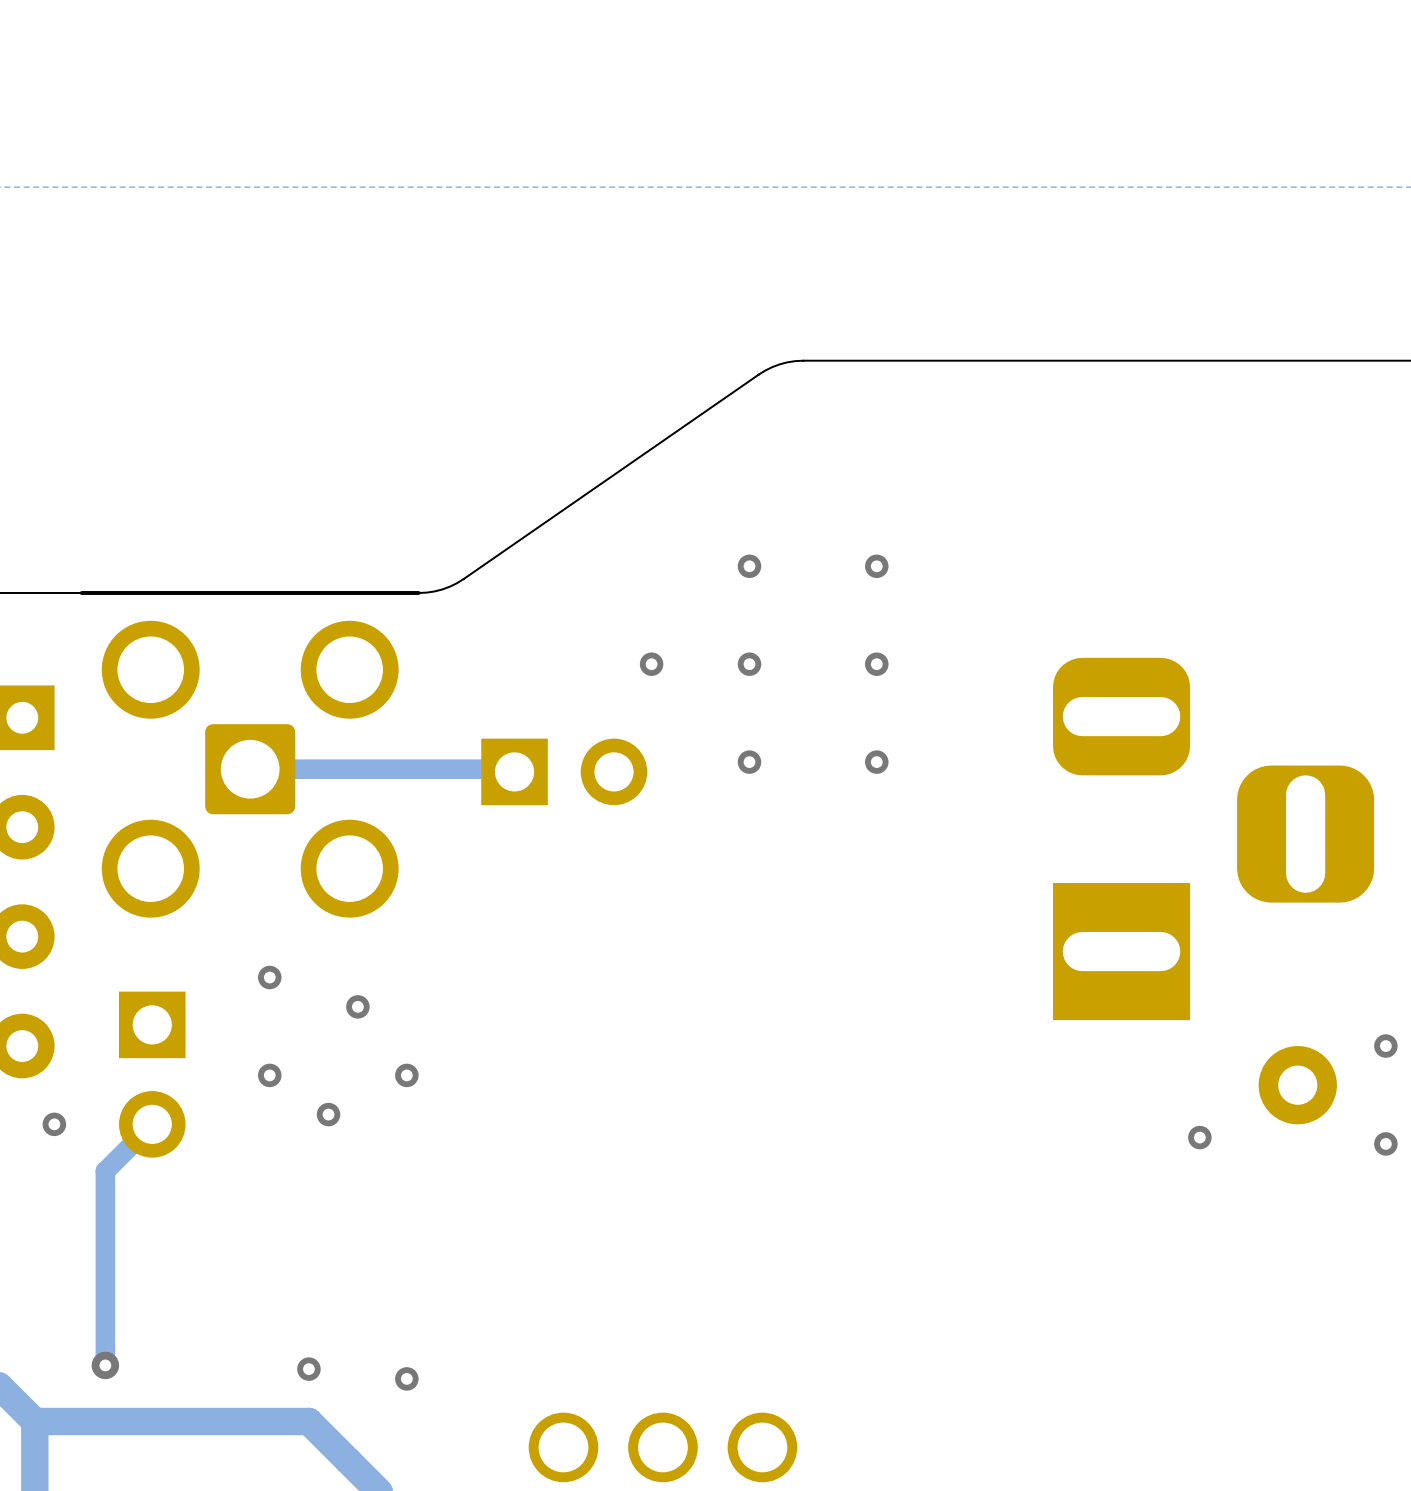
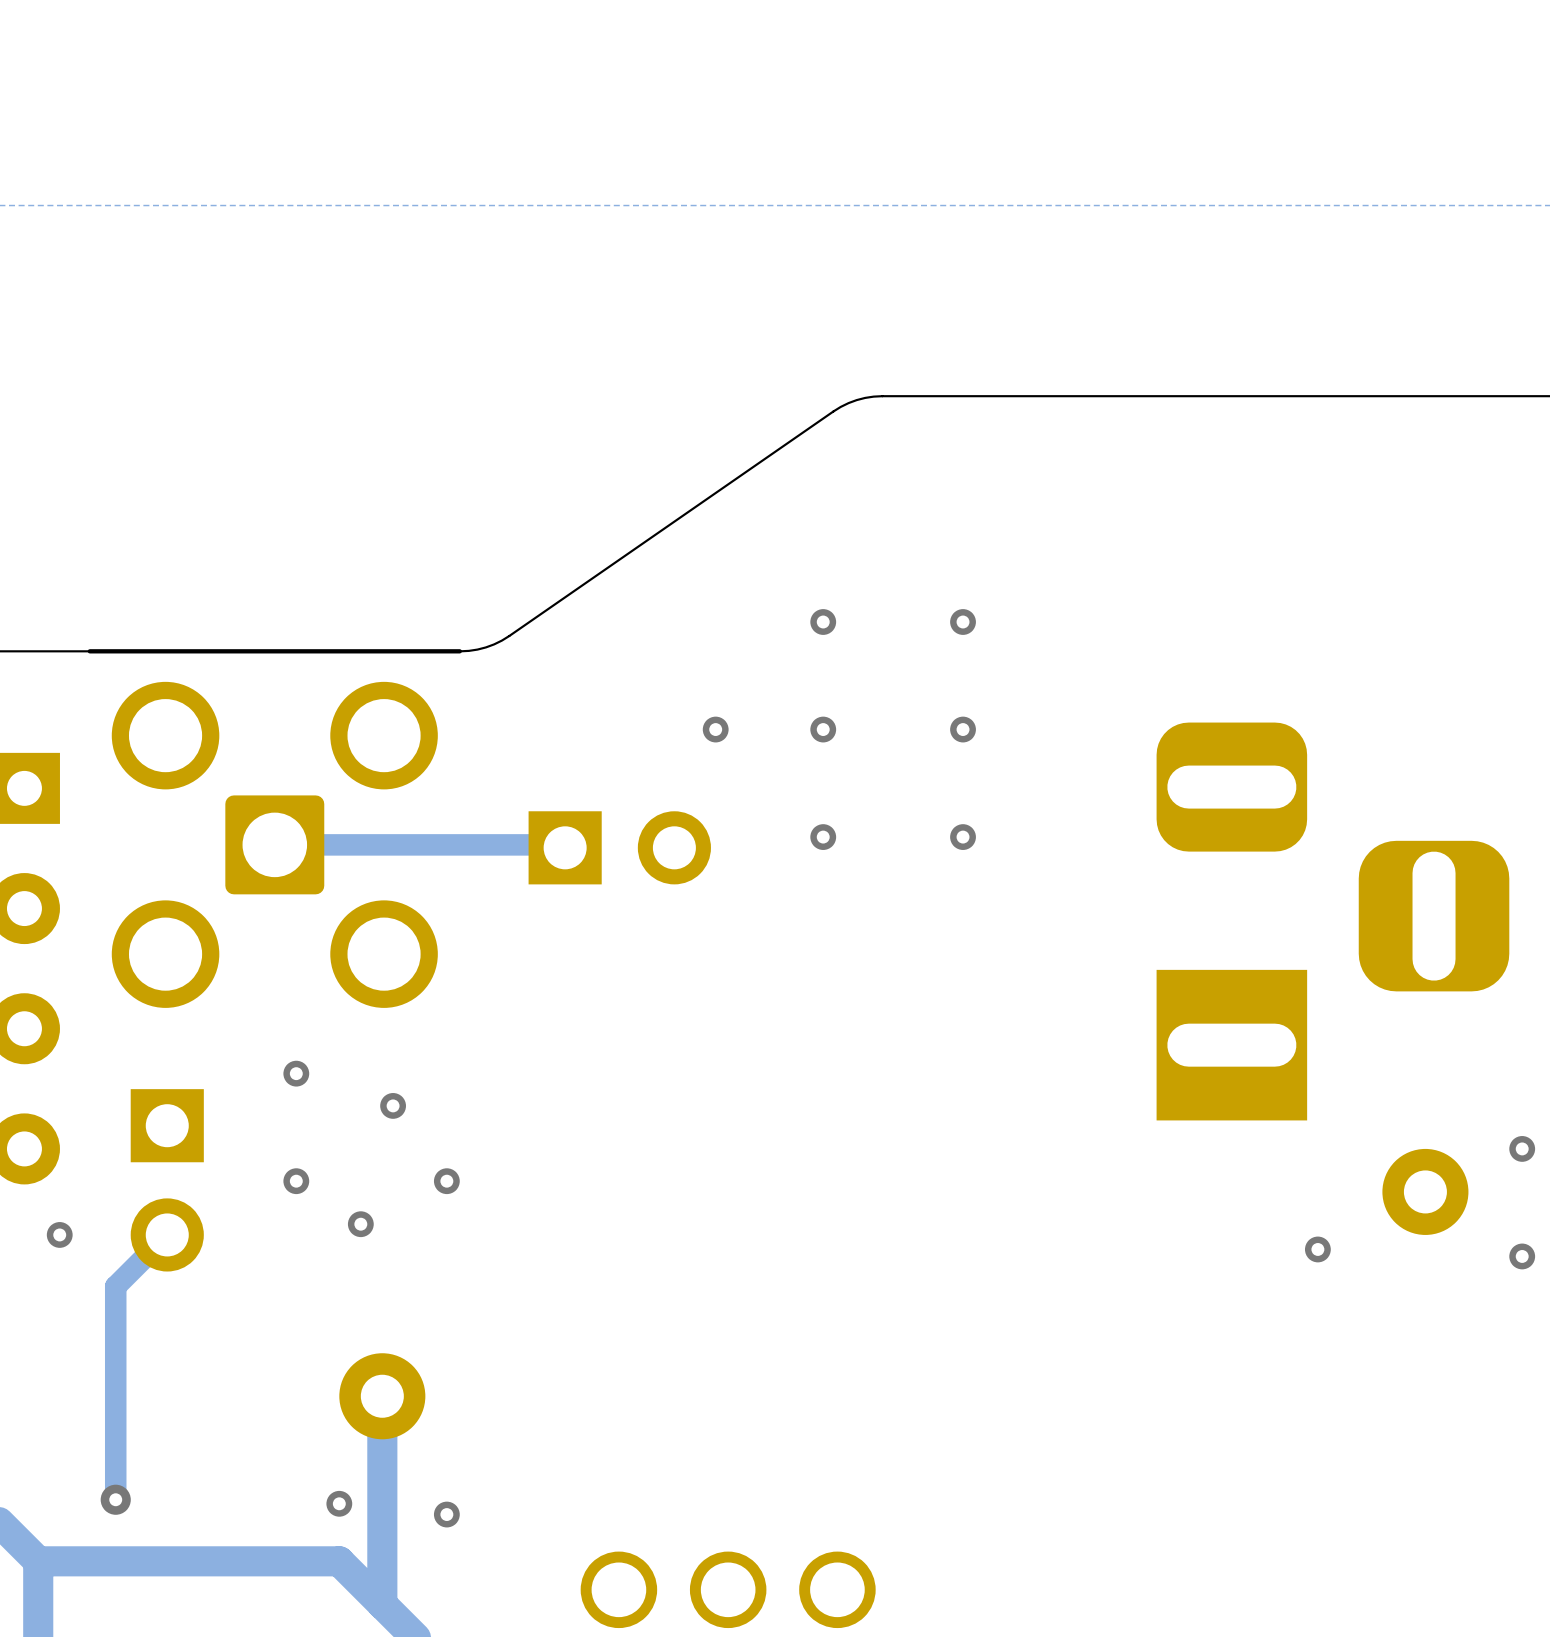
track: none -> (382, 1396) (382, 1604)
part: none -> (382, 1396)

